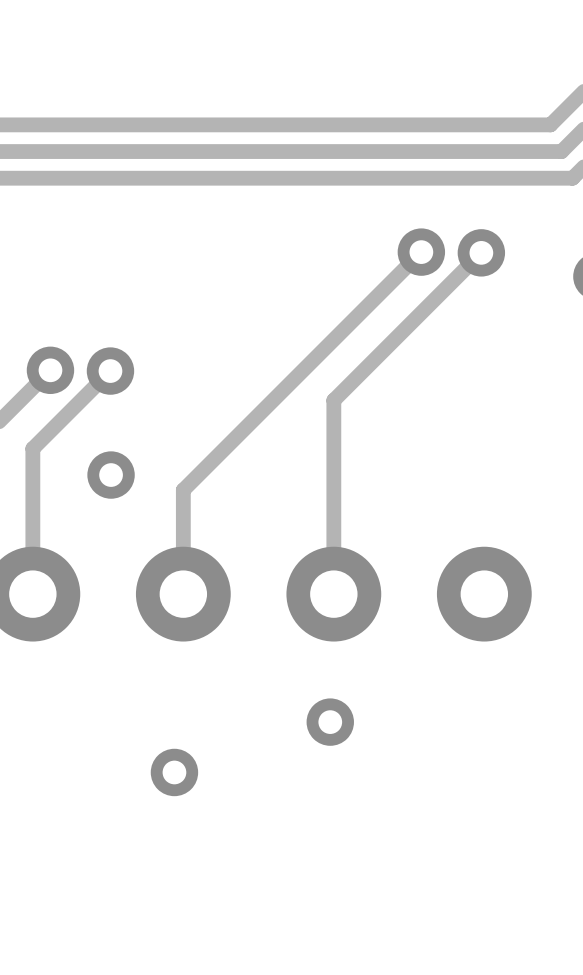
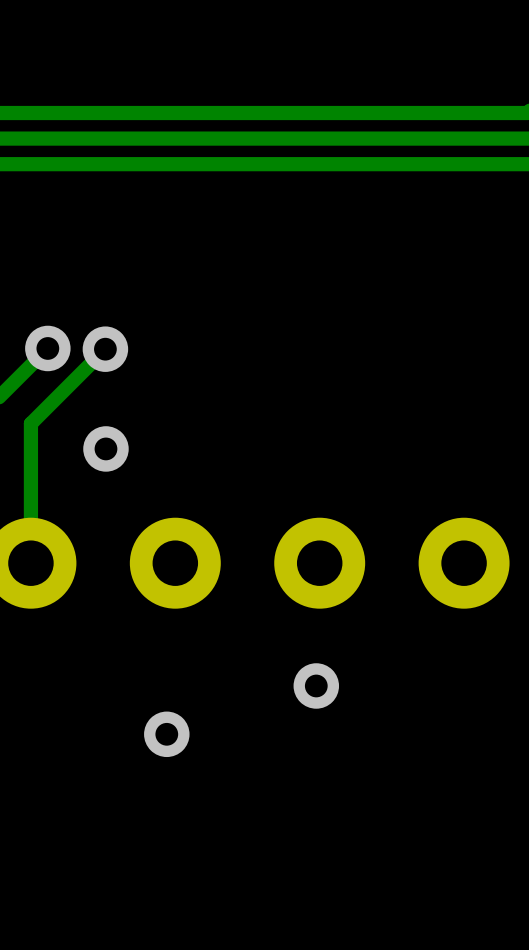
track: (421, 252) (183, 490) (183, 594) -> none
via: (421, 252) -> none
track: (481, 252) (333, 400) (333, 594) -> none
via: (481, 252) -> none

